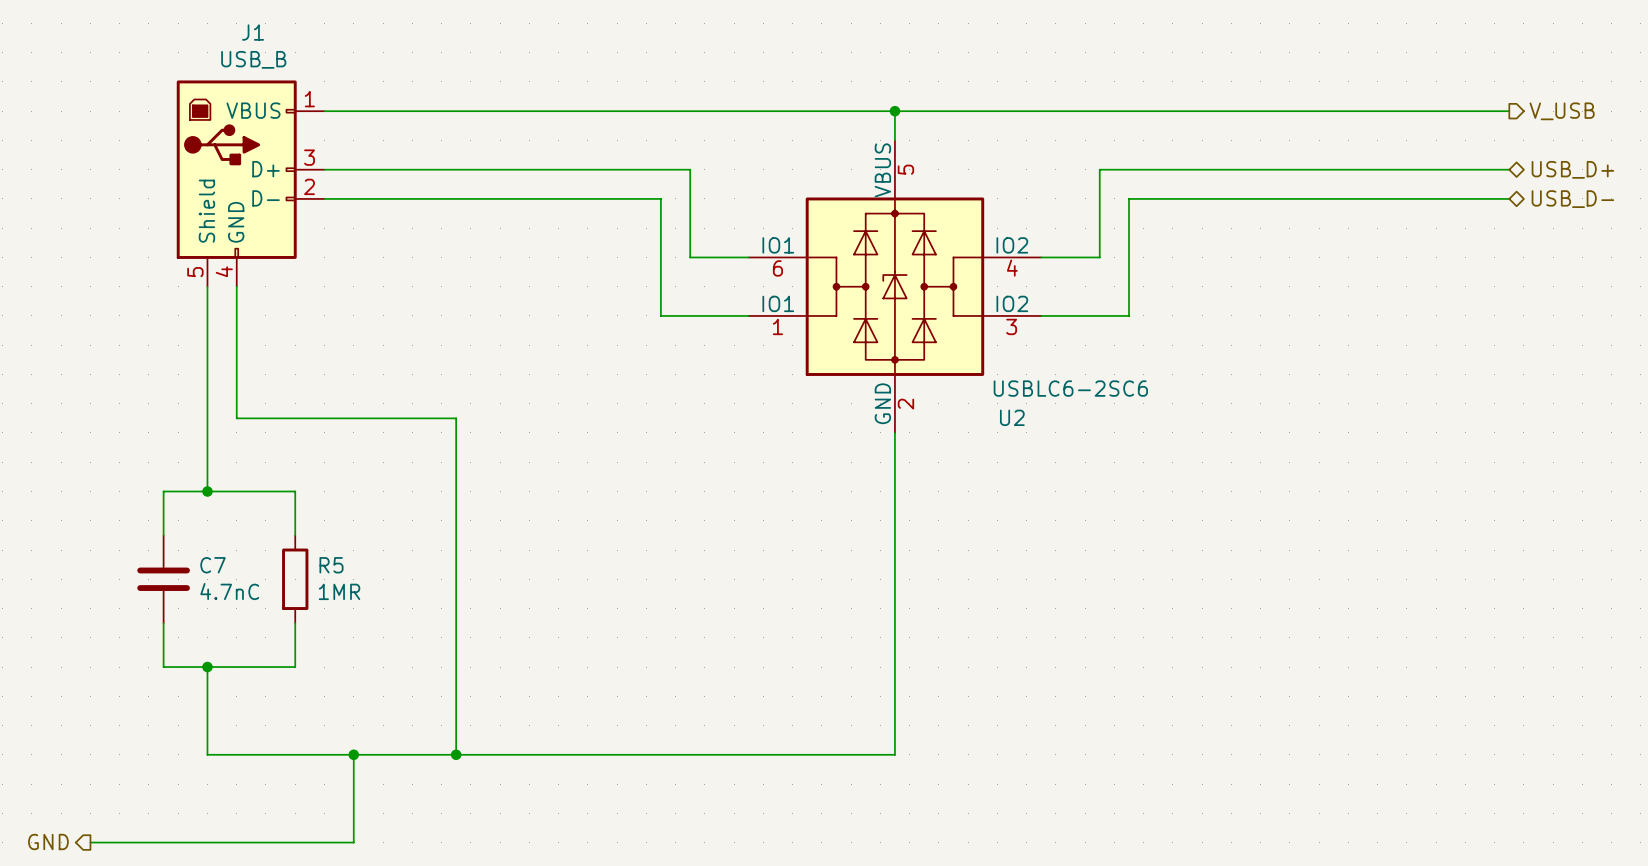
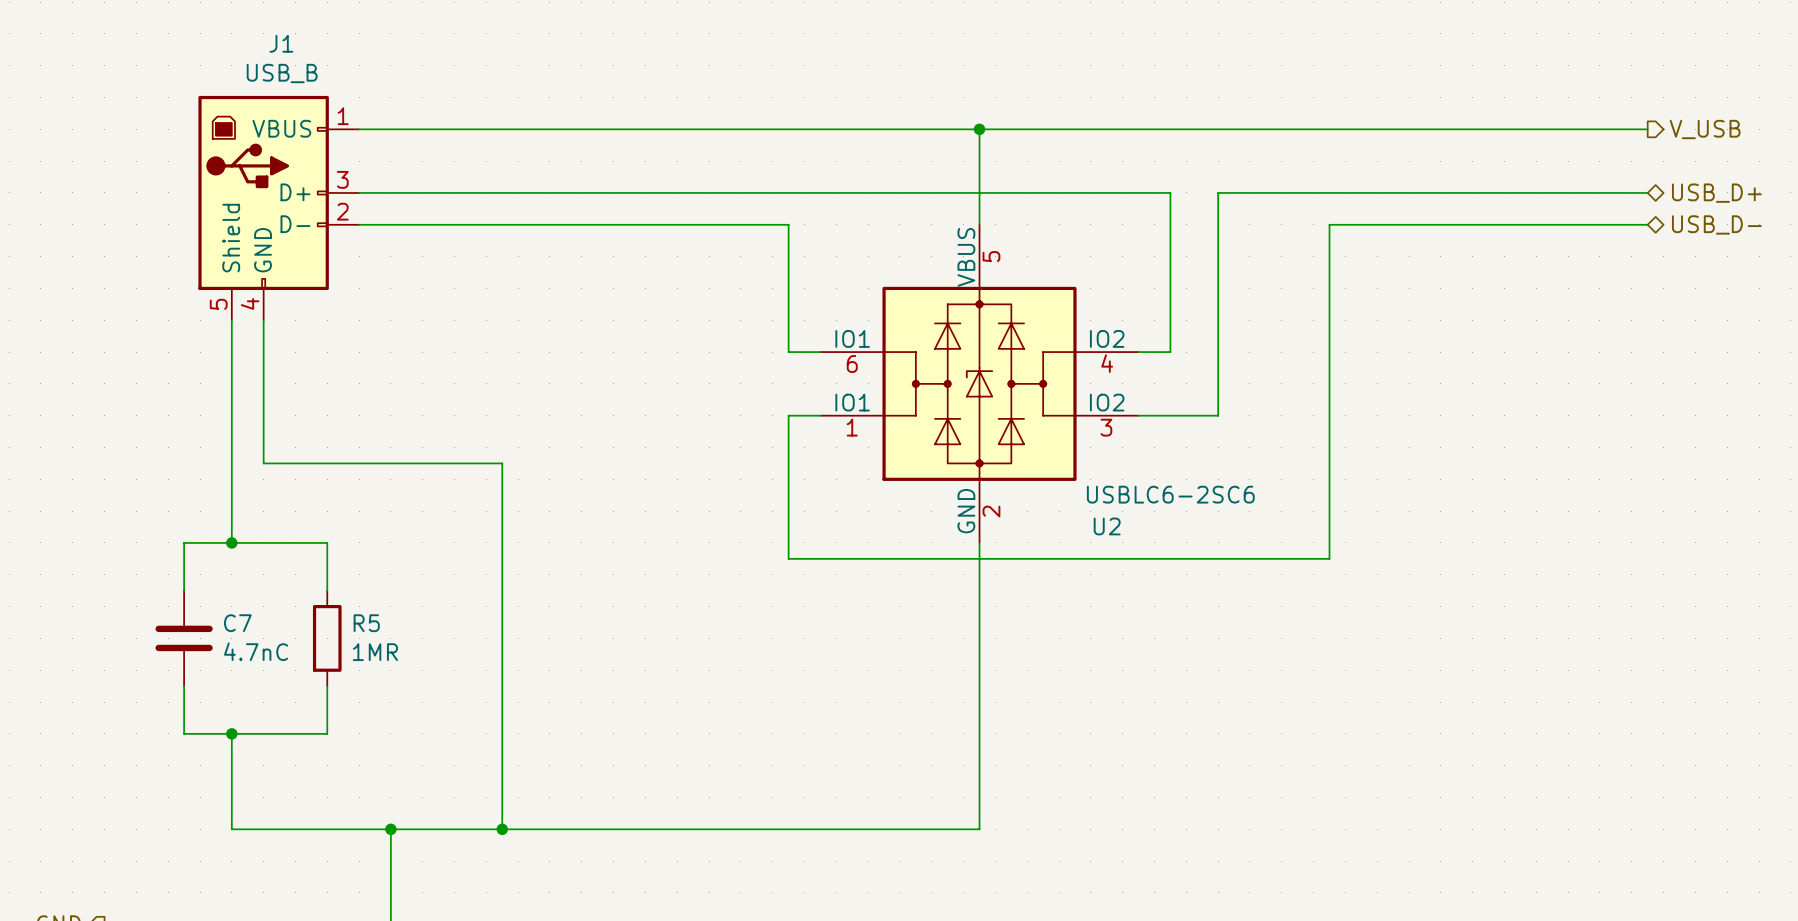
wire: (690, 169) (690, 257) (748, 257) -> (756, 192) (1170, 192) (1170, 352)
wire: (1114, 169) (1099, 169) (1099, 257) (1041, 257) -> (1218, 192) (1218, 415) (1138, 415)
wire: (660, 198) (660, 315) (719, 315) -> (724, 224) (788, 224) (788, 352)
wire: (1216, 198) (1129, 198) (1129, 315) (1070, 315) -> (1329, 224) (1329, 558) (788, 558) (788, 415) (820, 415)
U2 position: (894, 286) -> (979, 383)

